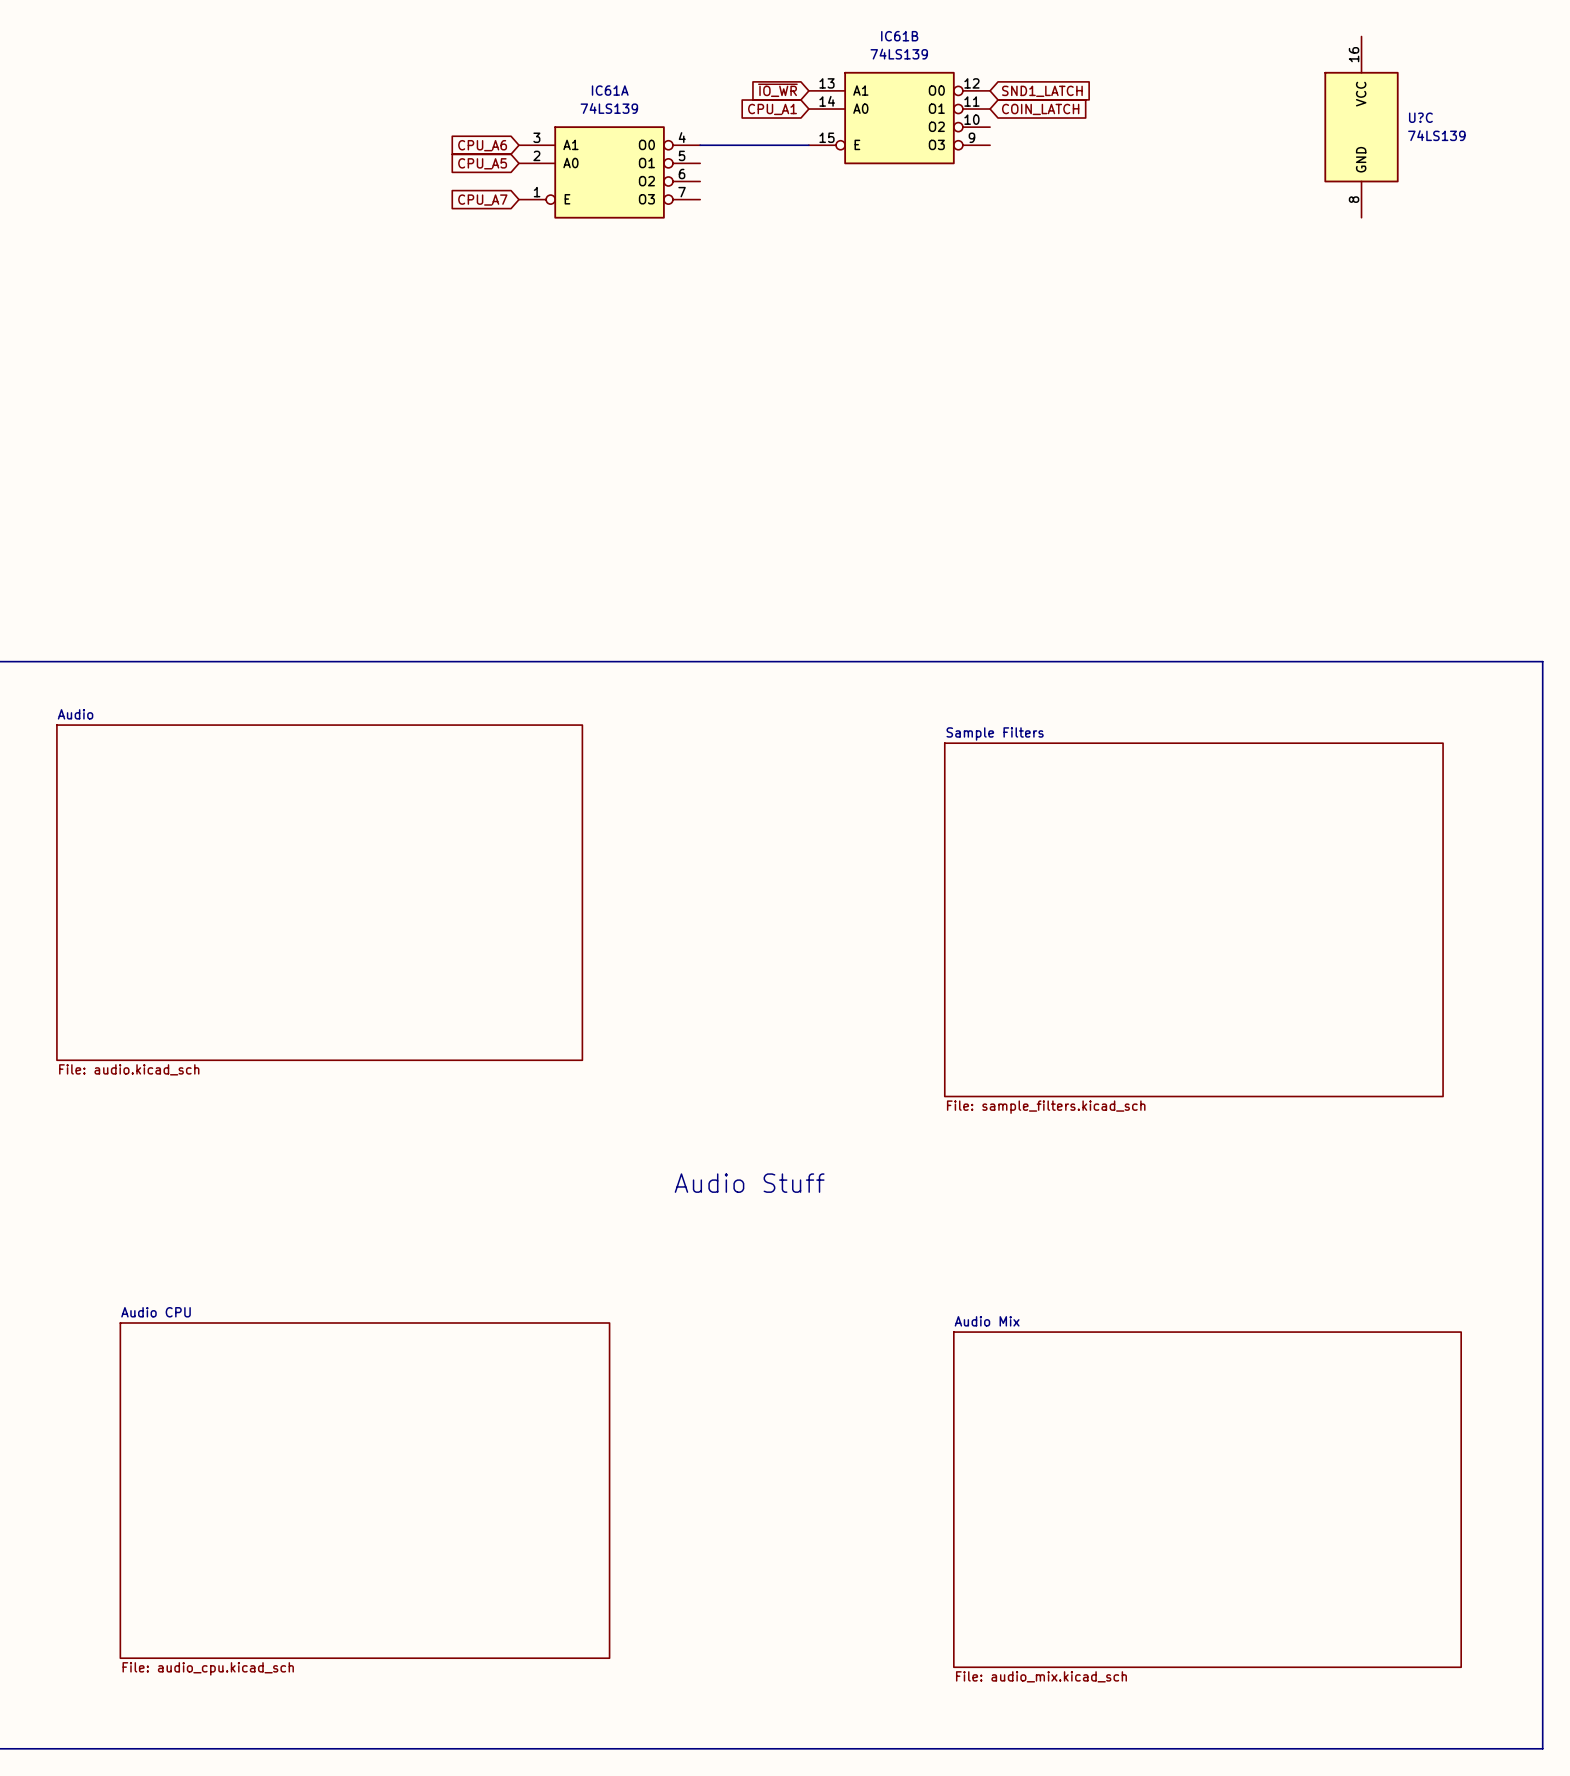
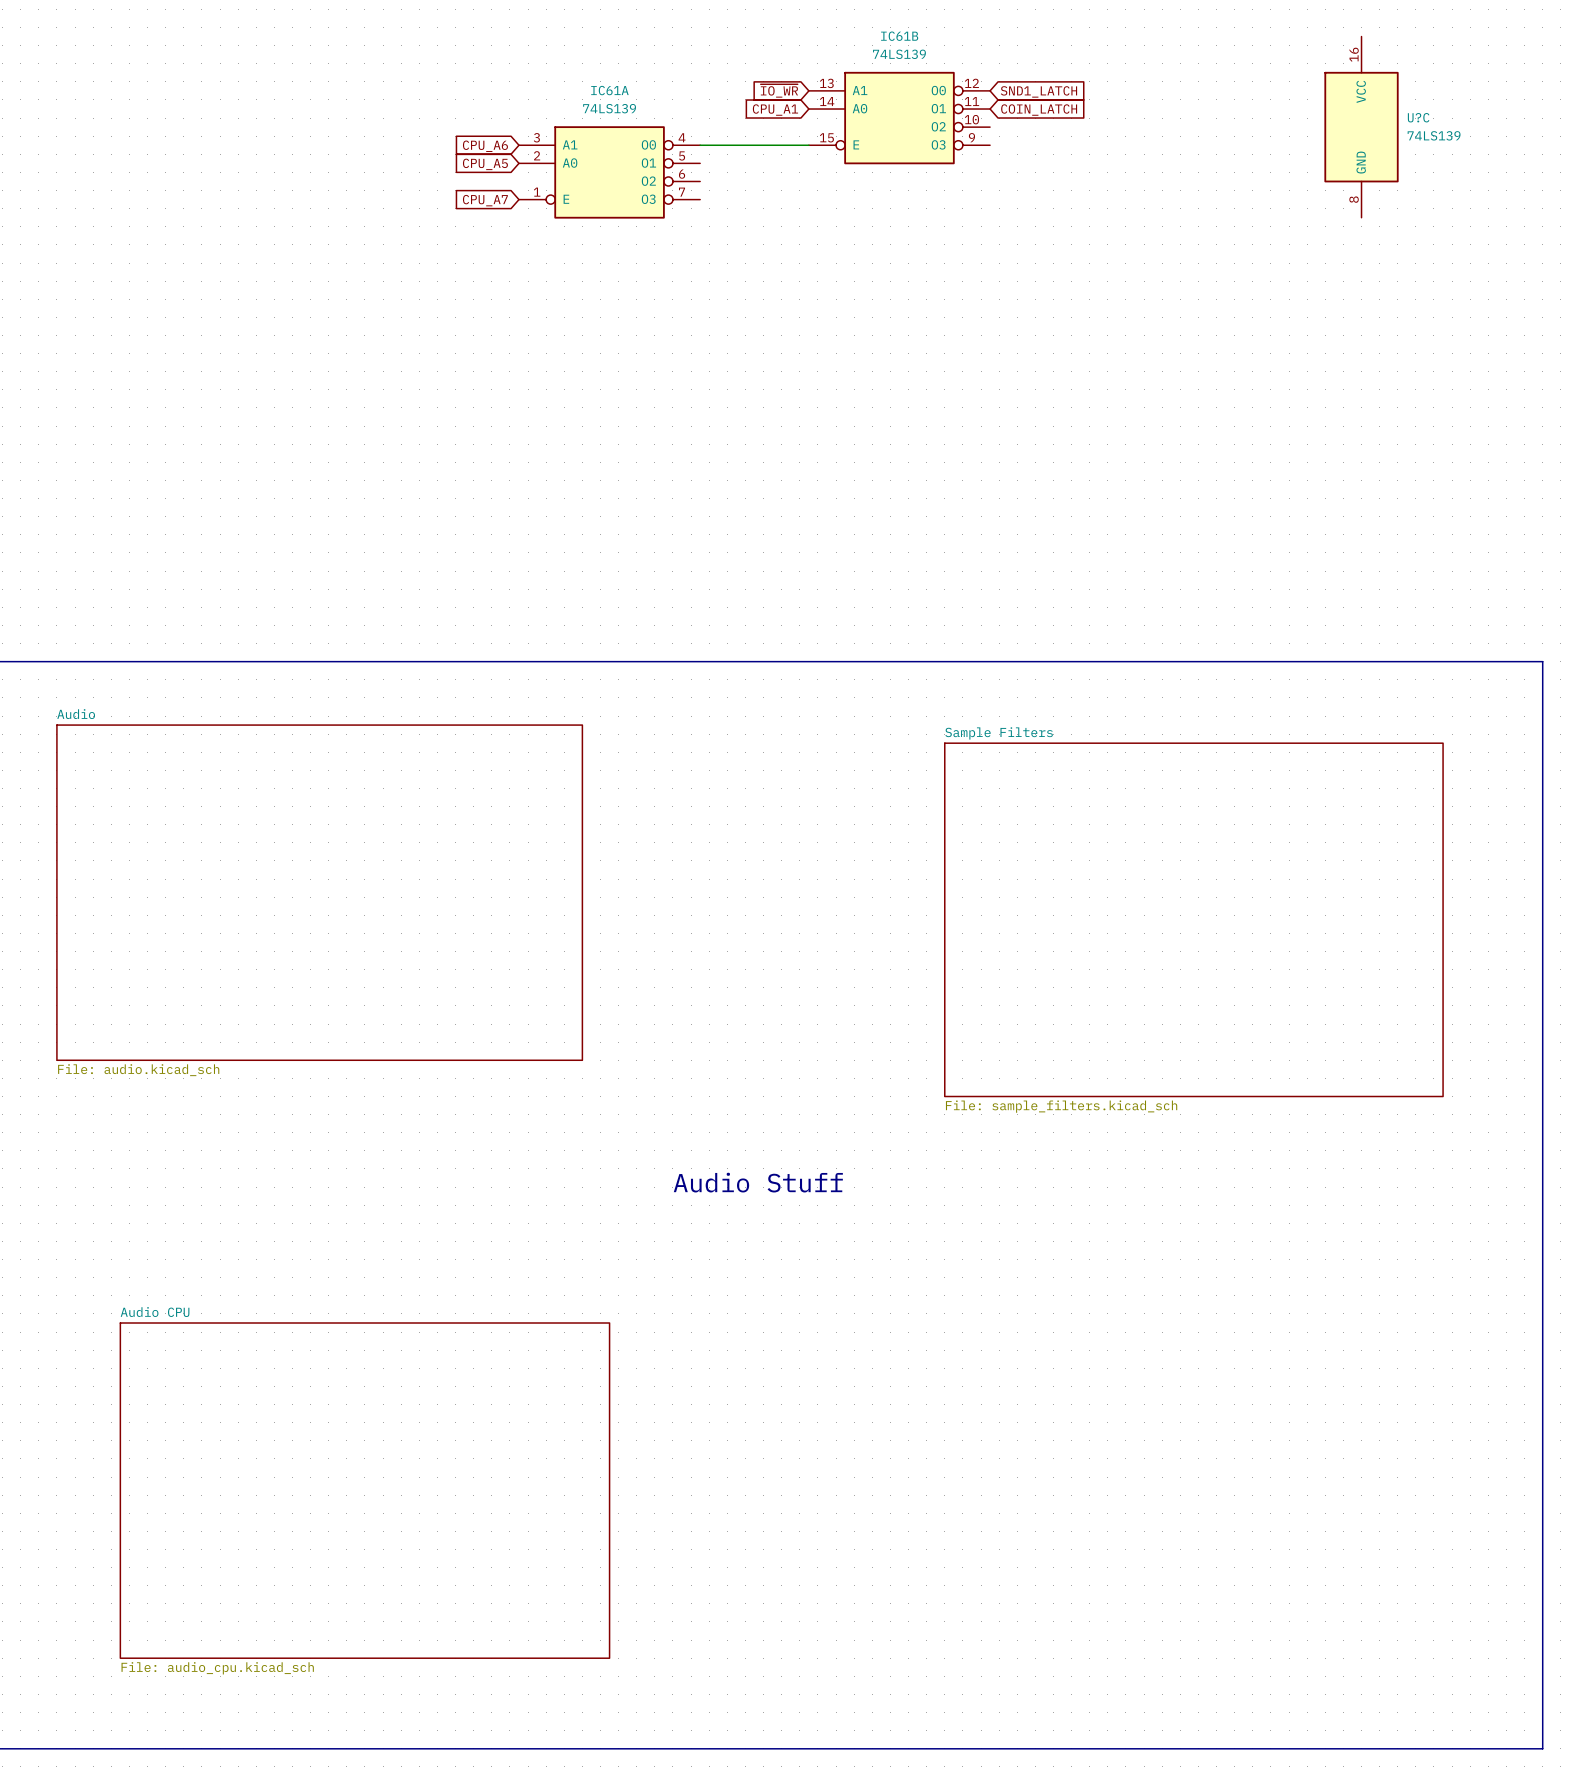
sheet Audio Mix: File: audio_mix.kicad_sch (1207, 1499) -> none

